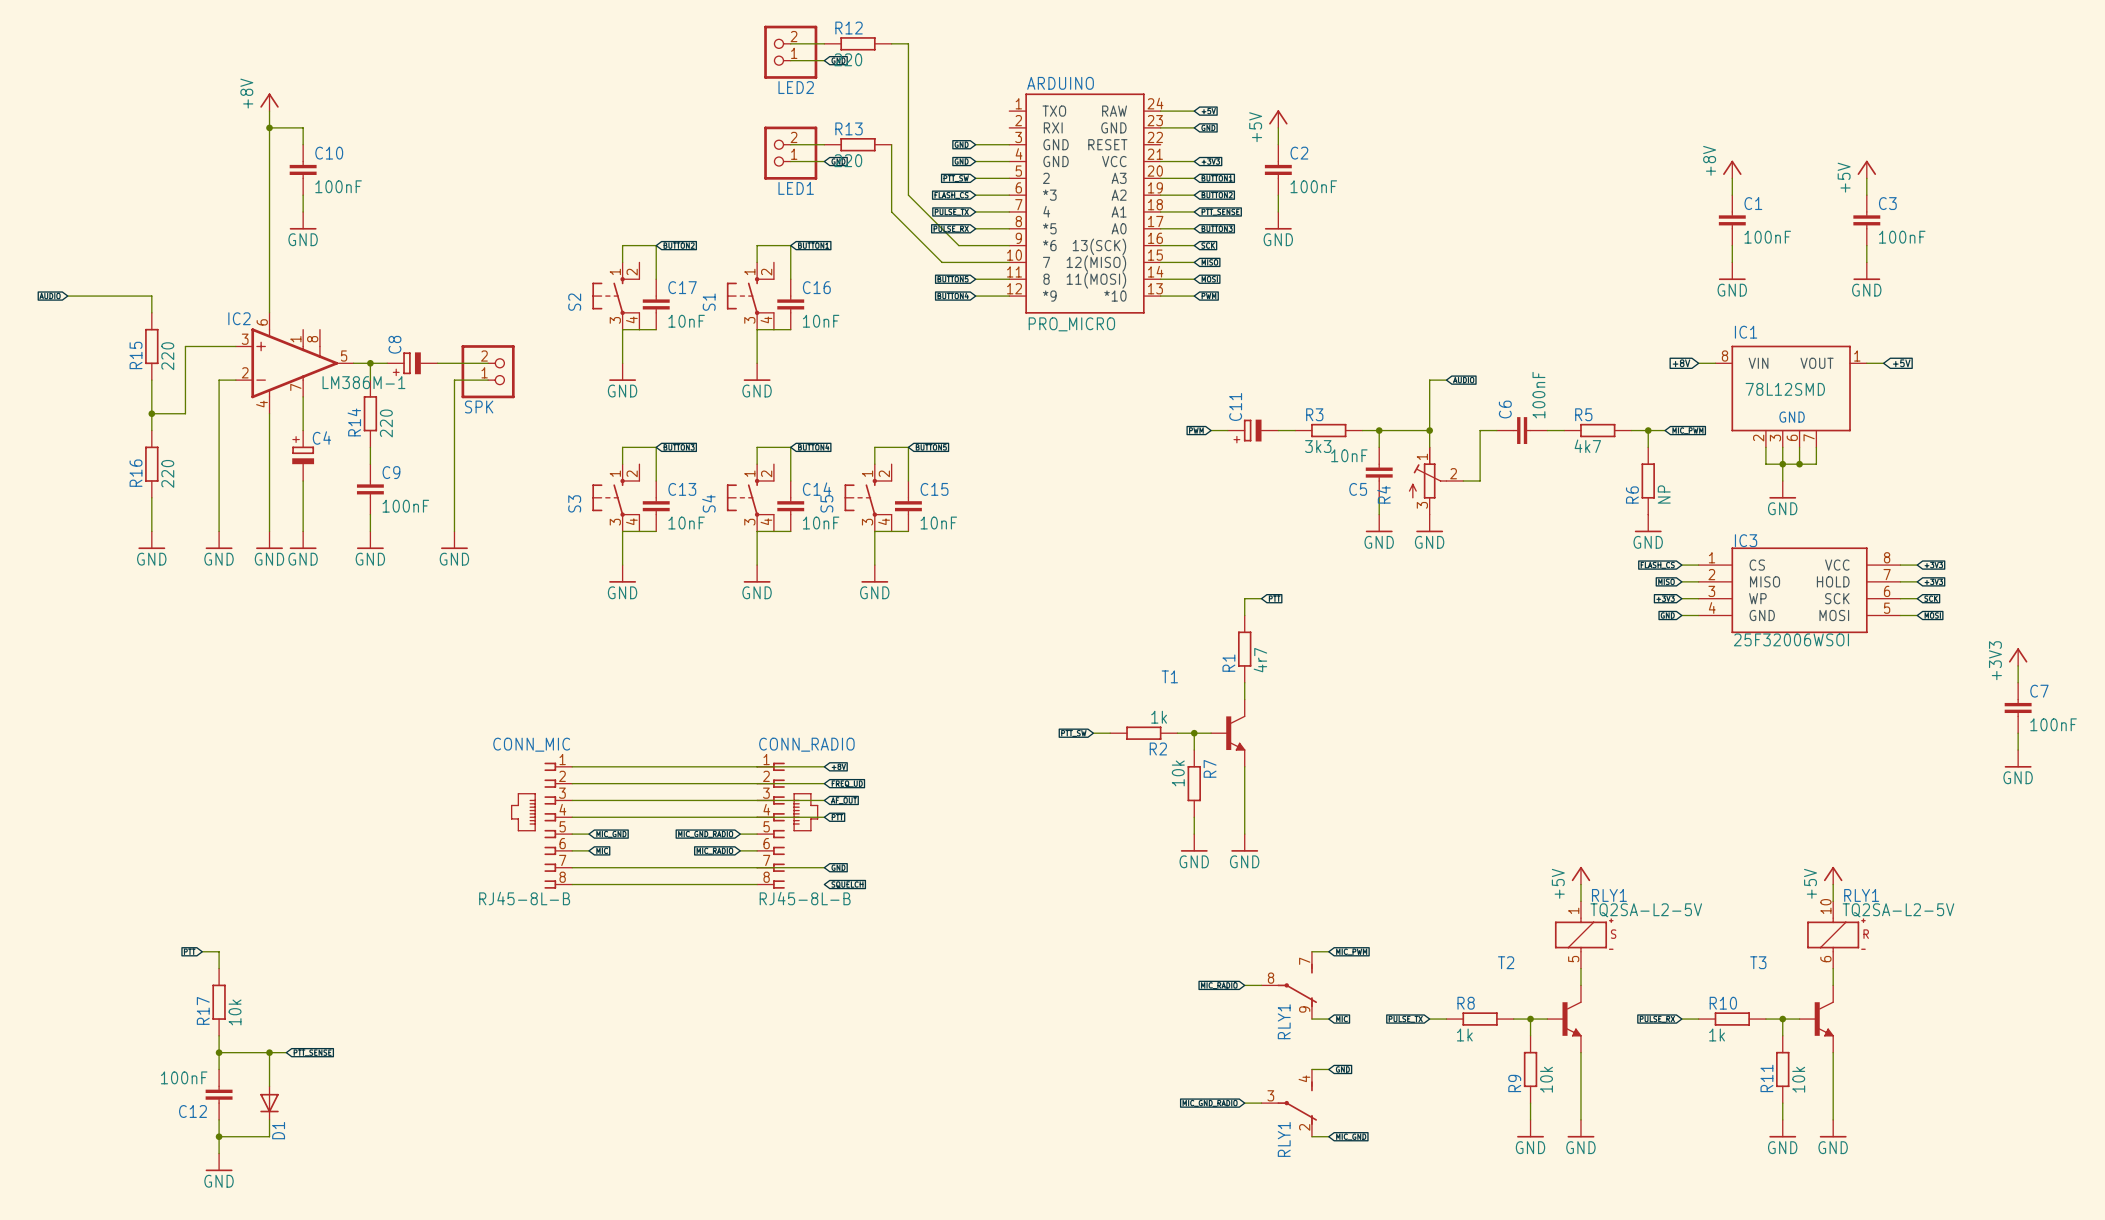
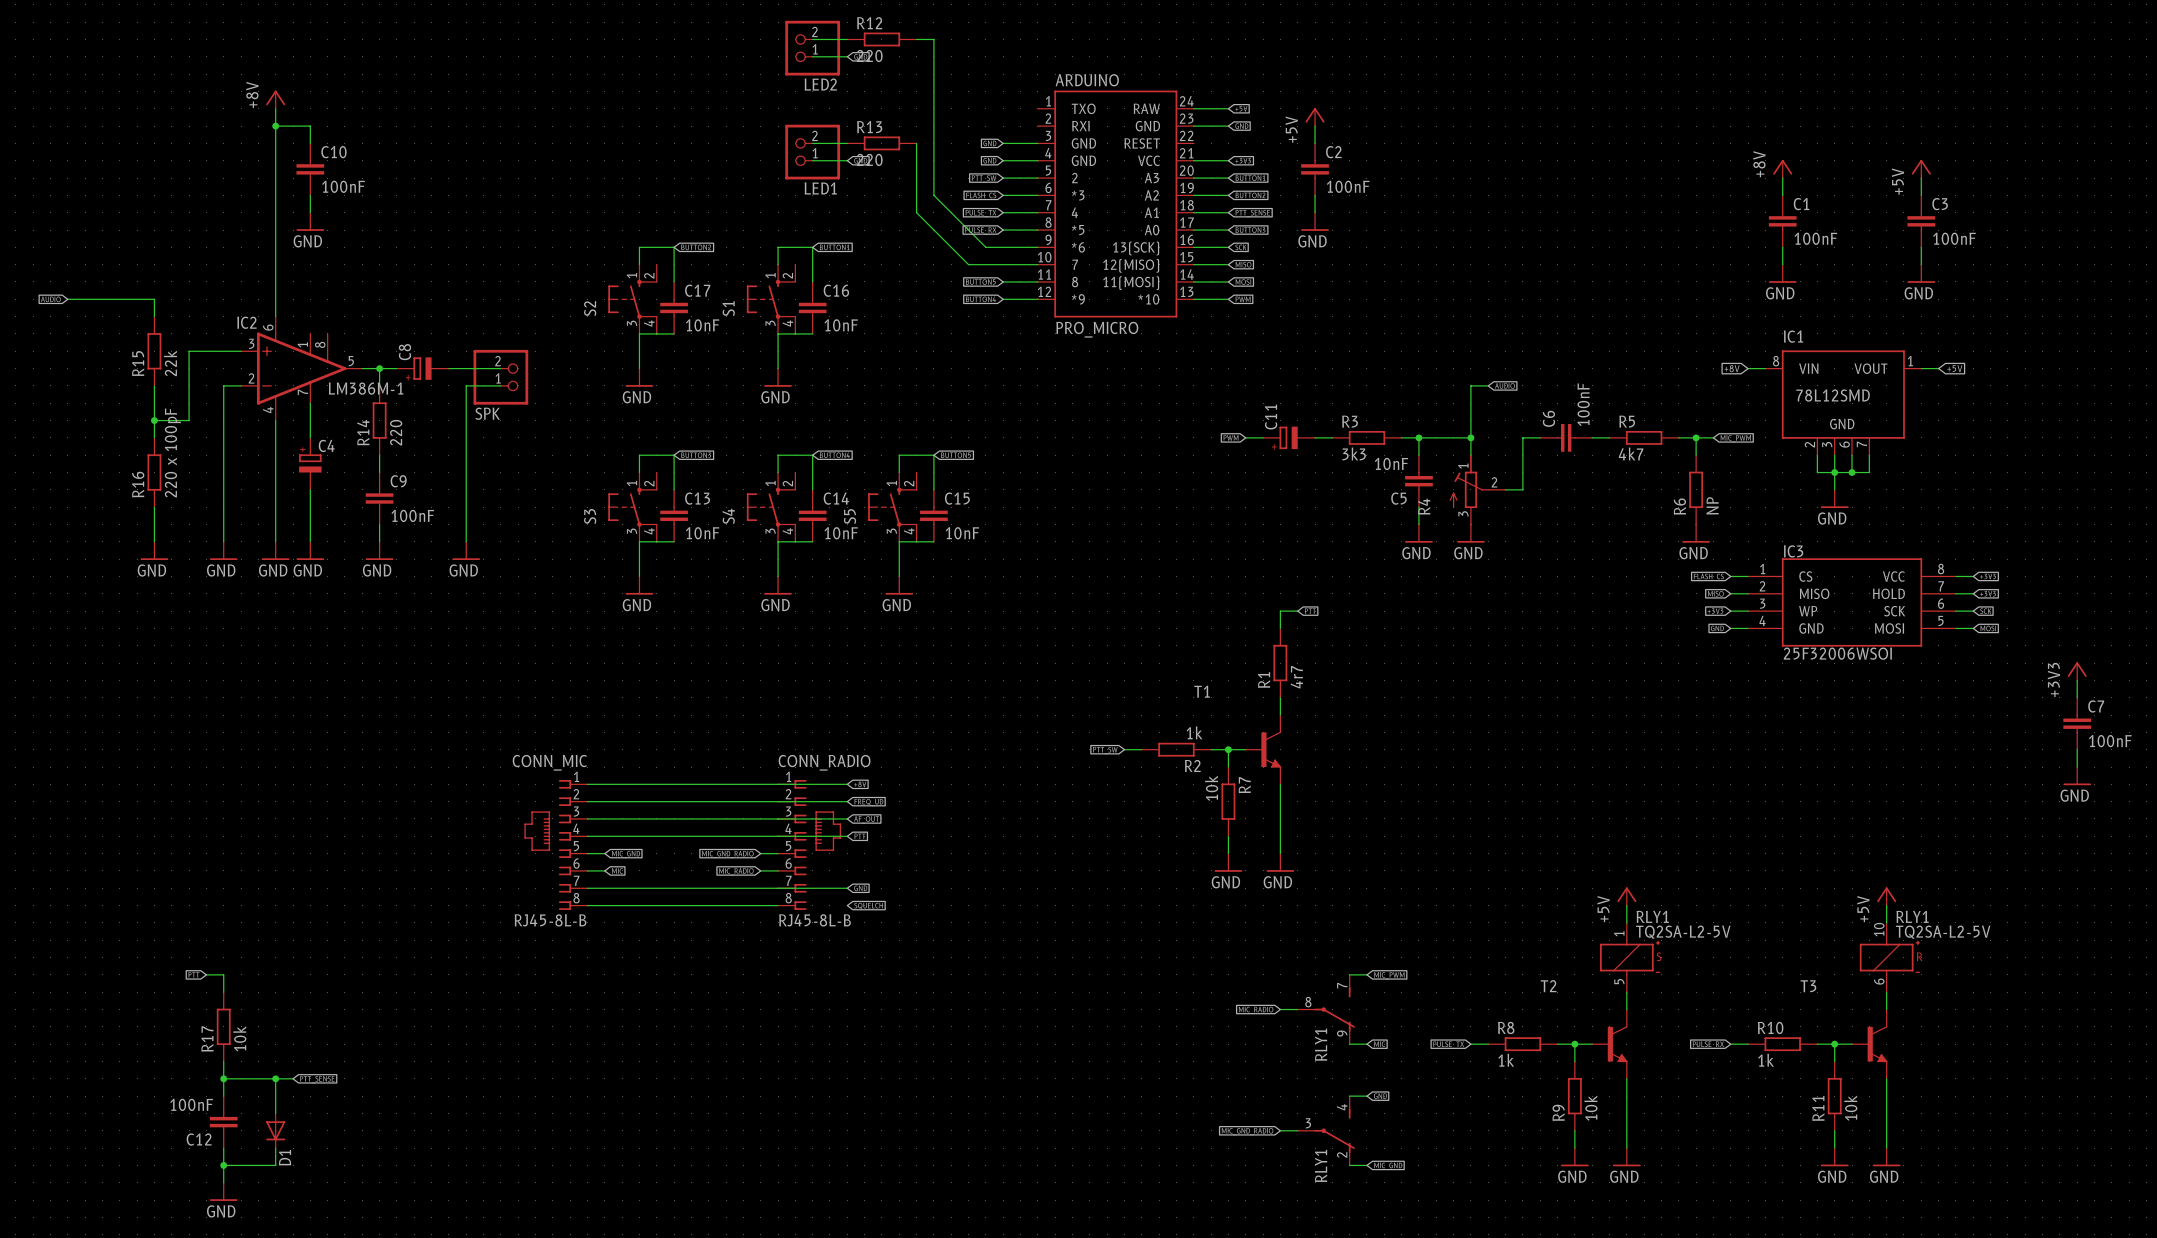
R15 value: 220 (167, 356) -> 22k (170, 363)
R16 value: 220 (167, 473) -> 220 x 100pF (172, 452)

